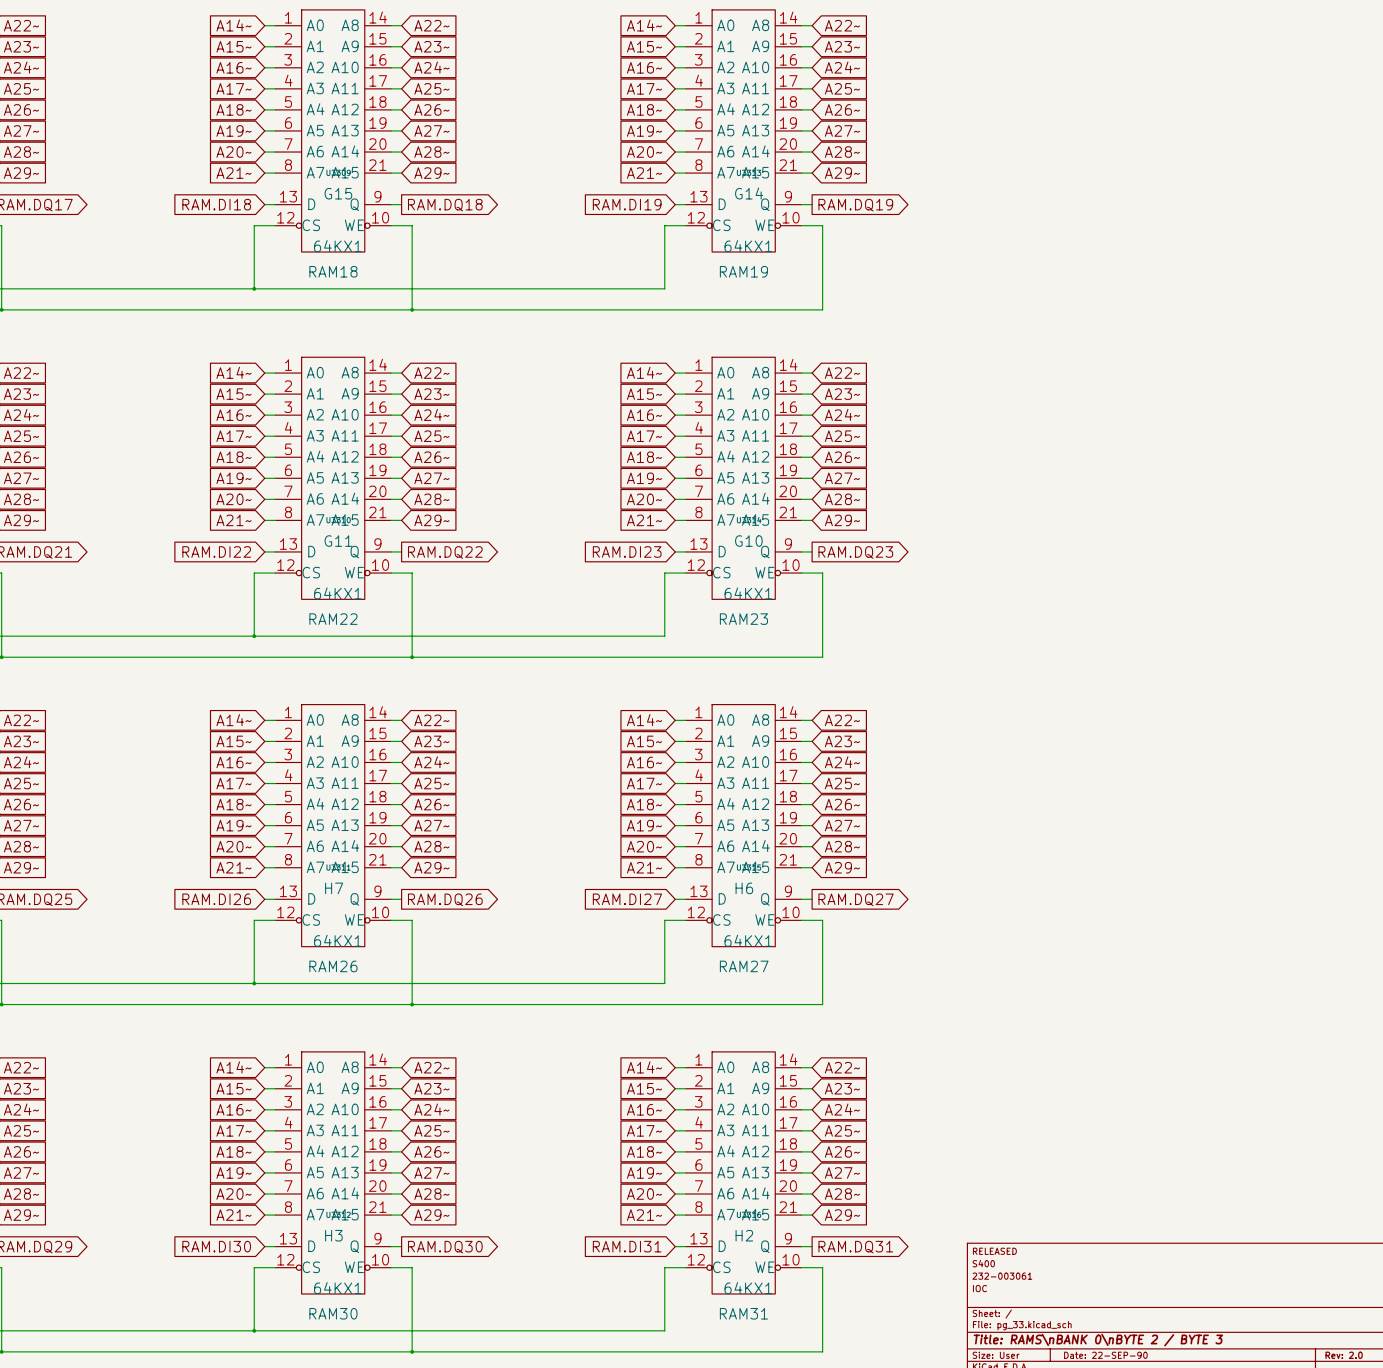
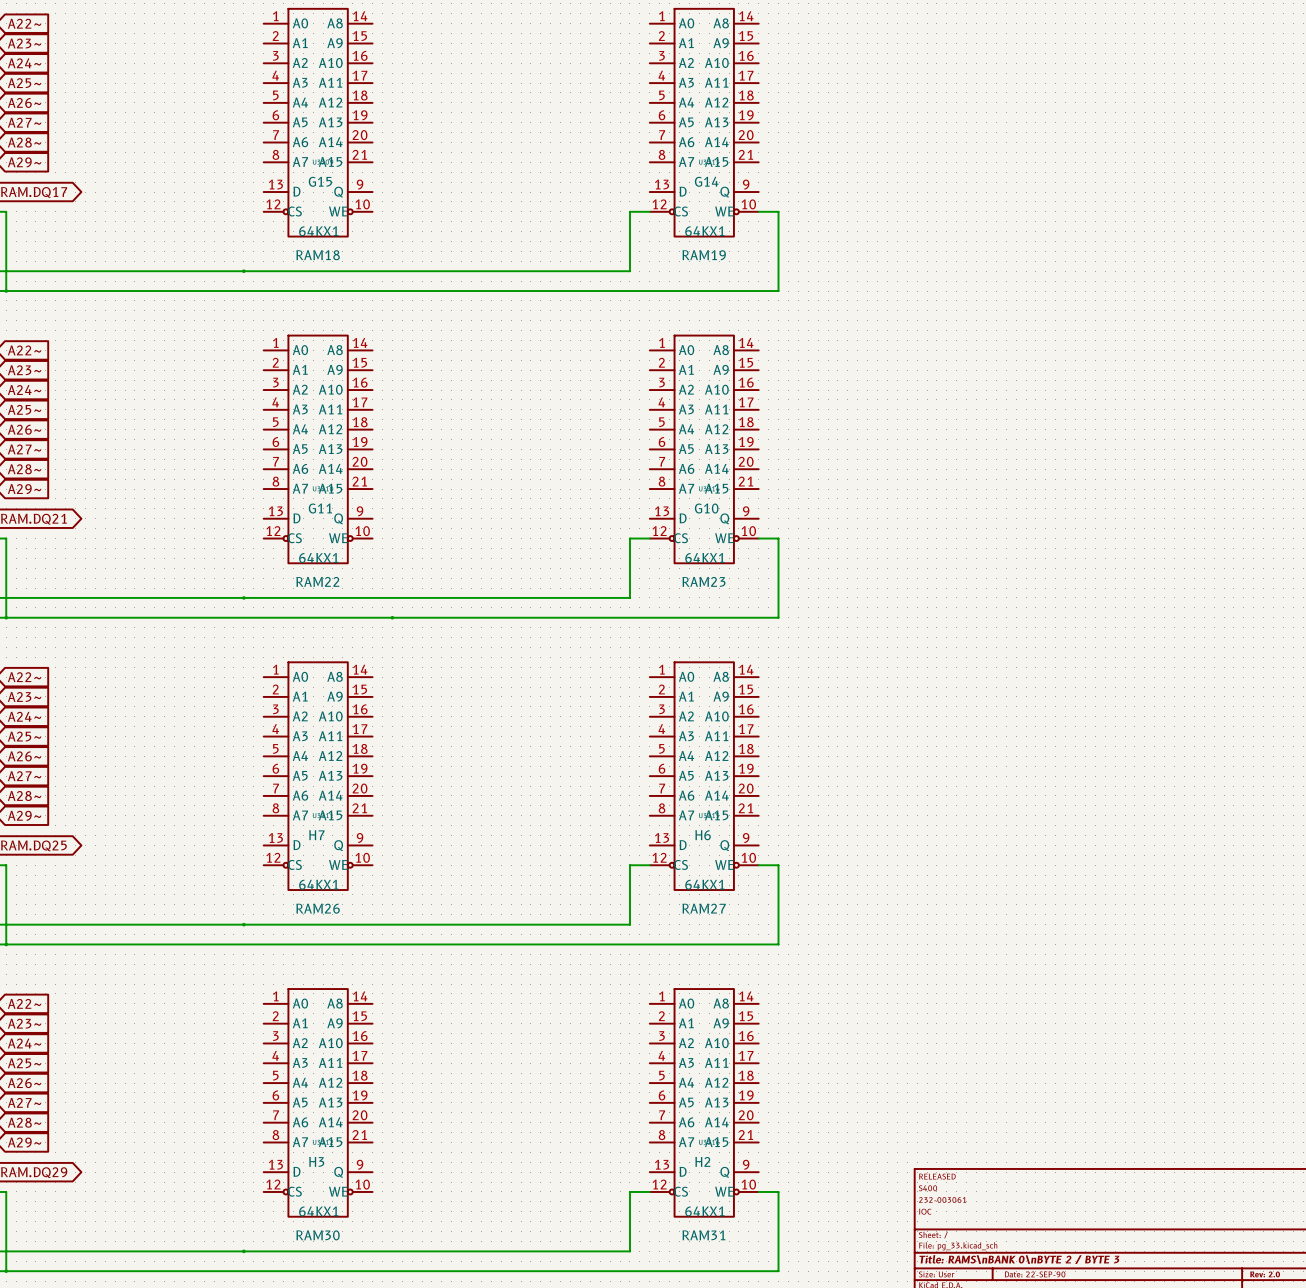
global label: A14~ (233, 25) -> none
wire: (264, 25) (275, 25) -> none
wire: (391, 25) (401, 25) -> none
global label: A22~ (431, 25) -> none
global label: A14~ (644, 25) -> none
wire: (675, 25) (685, 25) -> none
wire: (801, 25) (812, 25) -> none
global label: A22~ (842, 25) -> none
global label: A15~ (233, 46) -> none
wire: (264, 46) (275, 46) -> none
wire: (391, 46) (401, 46) -> none
global label: A23~ (431, 46) -> none
global label: A15~ (644, 46) -> none
wire: (675, 46) (685, 46) -> none
wire: (801, 46) (812, 46) -> none
global label: A23~ (842, 46) -> none
global label: A16~ (233, 67) -> none
wire: (264, 67) (275, 67) -> none
wire: (391, 67) (401, 67) -> none
global label: A24~ (431, 67) -> none
global label: A16~ (644, 67) -> none
wire: (675, 67) (685, 67) -> none
wire: (801, 67) (812, 67) -> none
global label: A24~ (842, 67) -> none
global label: A17~ (233, 88) -> none
wire: (264, 88) (275, 88) -> none
wire: (391, 88) (401, 88) -> none
global label: A25~ (431, 88) -> none
global label: A17~ (644, 88) -> none
wire: (675, 88) (685, 88) -> none
wire: (801, 88) (812, 88) -> none
global label: A25~ (842, 88) -> none
global label: A18~ (233, 109) -> none
wire: (264, 109) (275, 109) -> none
wire: (391, 109) (401, 109) -> none
global label: A26~ (431, 109) -> none
global label: A18~ (644, 109) -> none
wire: (675, 109) (685, 109) -> none
wire: (801, 109) (812, 109) -> none
global label: A26~ (842, 109) -> none
global label: A19~ (233, 130) -> none
wire: (264, 130) (275, 130) -> none
wire: (391, 130) (401, 130) -> none
global label: A27~ (431, 130) -> none
global label: A19~ (644, 130) -> none
wire: (675, 130) (685, 130) -> none
wire: (801, 130) (812, 130) -> none
global label: A27~ (842, 130) -> none
global label: A20~ (233, 152) -> none
wire: (264, 152) (275, 152) -> none
wire: (391, 152) (401, 152) -> none
global label: A28~ (431, 152) -> none
global label: A20~ (644, 152) -> none
wire: (675, 152) (685, 152) -> none
wire: (801, 152) (812, 152) -> none
global label: A28~ (842, 152) -> none
global label: A21~ (233, 173) -> none
wire: (264, 173) (275, 173) -> none
wire: (391, 173) (401, 173) -> none
global label: A29~ (431, 173) -> none
global label: A21~ (644, 173) -> none
wire: (675, 173) (685, 173) -> none
wire: (801, 173) (812, 173) -> none
global label: A29~ (842, 173) -> none
global label: RAM.DI18 (216, 204) -> none
wire: (264, 204) (275, 204) -> none
wire: (391, 204) (401, 204) -> none
global label: RAM.DI19 (627, 204) -> none
wire: (675, 204) (685, 204) -> none
wire: (801, 204) (812, 204) -> none
global label: RAM.DQ18 (445, 205) -> none
global label: RAM.DQ19 (855, 205) -> none
wire: (275, 225) (254, 225) (254, 288) -> none
wire: (391, 225) (412, 225) (412, 309) -> none
junction: (412, 309) -> none
global label: A14~ (233, 372) -> none
global label: A14~ (644, 372) -> none
wire: (264, 373) (275, 373) -> none
wire: (391, 373) (401, 373) -> none
global label: A22~ (431, 373) -> none
wire: (675, 373) (685, 373) -> none
wire: (801, 373) (812, 373) -> none
global label: A22~ (842, 373) -> none
global label: A15~ (233, 394) -> none
wire: (264, 394) (275, 394) -> none
wire: (391, 394) (401, 394) -> none
global label: A23~ (431, 394) -> none
global label: A15~ (644, 394) -> none
wire: (675, 394) (685, 394) -> none
wire: (801, 394) (812, 394) -> none
global label: A23~ (842, 394) -> none
global label: A24~ (431, 414) -> none
global label: A24~ (842, 414) -> none
global label: A16~ (233, 415) -> none
wire: (264, 415) (275, 415) -> none
wire: (391, 415) (401, 415) -> none
global label: A16~ (644, 415) -> none
wire: (675, 415) (685, 415) -> none
wire: (801, 415) (812, 415) -> none
global label: A17~ (233, 436) -> none
wire: (264, 436) (275, 436) -> none
wire: (391, 436) (401, 436) -> none
global label: A25~ (431, 436) -> none
global label: A17~ (644, 436) -> none
wire: (675, 436) (685, 436) -> none
wire: (801, 436) (812, 436) -> none
global label: A25~ (842, 436) -> none
global label: A18~ (233, 457) -> none
wire: (264, 457) (275, 457) -> none
wire: (391, 457) (401, 457) -> none
global label: A26~ (431, 457) -> none
global label: A18~ (644, 457) -> none
wire: (675, 457) (685, 457) -> none
wire: (801, 457) (812, 457) -> none
global label: A26~ (842, 457) -> none
global label: A19~ (233, 478) -> none
wire: (264, 478) (275, 478) -> none
wire: (391, 478) (401, 478) -> none
global label: A27~ (431, 478) -> none
global label: A19~ (644, 478) -> none
wire: (675, 478) (685, 478) -> none
wire: (801, 478) (812, 478) -> none
global label: A27~ (842, 478) -> none
global label: A20~ (233, 499) -> none
wire: (264, 499) (275, 499) -> none
wire: (391, 499) (401, 499) -> none
global label: A28~ (431, 499) -> none
global label: A20~ (644, 499) -> none
wire: (675, 499) (685, 499) -> none
wire: (801, 499) (812, 499) -> none
global label: A28~ (842, 499) -> none
global label: A21~ (233, 520) -> none
wire: (264, 520) (275, 520) -> none
wire: (391, 520) (401, 520) -> none
global label: A29~ (431, 520) -> none
global label: A21~ (644, 520) -> none
wire: (675, 520) (685, 520) -> none
wire: (801, 520) (812, 520) -> none
global label: A29~ (842, 520) -> none
global label: RAM.DI22 (216, 551) -> none
wire: (264, 551) (275, 551) -> none
wire: (391, 551) (401, 551) -> none
global label: RAM.DI23 (627, 551) -> none
wire: (675, 551) (685, 551) -> none
wire: (801, 551) (812, 551) -> none
global label: RAM.DQ22 (445, 552) -> none
global label: RAM.DQ23 (855, 552) -> none
wire: (275, 573) (254, 573) (254, 636) -> none
wire: (391, 573) (412, 573) (412, 657) -> none
global label: A14~ (233, 720) -> none
wire: (264, 720) (275, 720) -> none
wire: (391, 720) (401, 720) -> none
global label: A22~ (431, 720) -> none
global label: A14~ (644, 720) -> none
wire: (675, 720) (685, 720) -> none
wire: (801, 720) (812, 720) -> none
global label: A22~ (842, 720) -> none
global label: A15~ (233, 741) -> none
wire: (264, 741) (275, 741) -> none
wire: (391, 741) (401, 741) -> none
global label: A23~ (431, 741) -> none
global label: A15~ (644, 741) -> none
wire: (675, 741) (685, 741) -> none
wire: (801, 741) (812, 741) -> none
global label: A23~ (842, 741) -> none
global label: A16~ (233, 762) -> none
wire: (264, 762) (275, 762) -> none
wire: (391, 762) (401, 762) -> none
global label: A24~ (431, 762) -> none
global label: A16~ (644, 762) -> none
wire: (675, 762) (685, 762) -> none
wire: (801, 762) (812, 762) -> none
global label: A24~ (842, 762) -> none
global label: A17~ (233, 783) -> none
wire: (264, 783) (275, 783) -> none
wire: (391, 783) (401, 783) -> none
global label: A25~ (431, 783) -> none
global label: A17~ (644, 783) -> none
wire: (675, 783) (685, 783) -> none
wire: (801, 783) (812, 783) -> none
global label: A25~ (842, 783) -> none
global label: A18~ (233, 804) -> none
wire: (264, 804) (275, 804) -> none
wire: (391, 804) (401, 804) -> none
global label: A26~ (431, 804) -> none
global label: A18~ (644, 804) -> none
wire: (675, 804) (685, 804) -> none
wire: (801, 804) (812, 804) -> none
global label: A26~ (842, 804) -> none
global label: A19~ (233, 825) -> none
wire: (264, 825) (275, 825) -> none
wire: (391, 825) (401, 825) -> none
global label: A27~ (431, 825) -> none
global label: A19~ (644, 825) -> none
wire: (675, 825) (685, 825) -> none
wire: (801, 825) (812, 825) -> none
global label: A27~ (842, 825) -> none
global label: A20~ (233, 846) -> none
wire: (264, 846) (275, 846) -> none
wire: (391, 846) (401, 846) -> none
global label: A28~ (431, 846) -> none
global label: A20~ (644, 846) -> none
wire: (675, 846) (685, 846) -> none
wire: (801, 846) (812, 846) -> none
global label: A28~ (842, 846) -> none
global label: A21~ (233, 867) -> none
wire: (264, 867) (275, 867) -> none
wire: (391, 867) (401, 867) -> none
global label: A29~ (431, 867) -> none
global label: A21~ (644, 867) -> none
wire: (675, 867) (685, 867) -> none
wire: (801, 867) (812, 867) -> none
global label: A29~ (842, 867) -> none
global label: RAM.DI26 (216, 899) -> none
wire: (264, 899) (275, 899) -> none
wire: (391, 899) (401, 899) -> none
global label: RAM.DQ26 (445, 899) -> none
global label: RAM.DI27 (627, 899) -> none
wire: (675, 899) (685, 899) -> none
wire: (801, 899) (812, 899) -> none
global label: RAM.DQ27 (856, 899) -> none
wire: (275, 920) (254, 920) (254, 983) -> none
wire: (391, 920) (412, 920) (412, 1004) -> none
junction: (412, 1004) -> none
global label: A14~ (233, 1067) -> none
wire: (264, 1067) (275, 1067) -> none
wire: (391, 1067) (401, 1067) -> none
global label: A22~ (431, 1067) -> none
global label: A14~ (644, 1067) -> none
wire: (675, 1067) (685, 1067) -> none
wire: (801, 1067) (812, 1067) -> none
global label: A22~ (842, 1067) -> none
global label: A15~ (233, 1088) -> none
wire: (264, 1088) (275, 1088) -> none
wire: (391, 1088) (401, 1088) -> none
global label: A23~ (431, 1088) -> none
global label: A15~ (644, 1088) -> none
wire: (675, 1088) (685, 1088) -> none
wire: (801, 1088) (812, 1088) -> none
global label: A23~ (842, 1088) -> none
global label: A16~ (233, 1109) -> none
wire: (264, 1109) (275, 1109) -> none
wire: (391, 1109) (401, 1109) -> none
global label: A24~ (431, 1109) -> none
global label: A16~ (644, 1109) -> none
wire: (675, 1109) (685, 1109) -> none
wire: (801, 1109) (812, 1109) -> none
global label: A24~ (842, 1109) -> none
global label: A17~ (233, 1130) -> none
wire: (264, 1130) (275, 1130) -> none
wire: (391, 1130) (401, 1130) -> none
global label: A25~ (431, 1130) -> none
global label: A17~ (644, 1130) -> none
wire: (675, 1130) (685, 1130) -> none
wire: (801, 1130) (812, 1130) -> none
global label: A25~ (842, 1130) -> none
global label: A18~ (233, 1151) -> none
wire: (264, 1151) (275, 1151) -> none
wire: (391, 1151) (401, 1151) -> none
global label: A26~ (431, 1151) -> none
global label: A18~ (644, 1151) -> none
wire: (675, 1151) (685, 1151) -> none
wire: (801, 1151) (812, 1151) -> none
global label: A26~ (842, 1151) -> none
global label: A19~ (233, 1172) -> none
wire: (264, 1172) (275, 1172) -> none
wire: (391, 1172) (401, 1172) -> none
global label: A27~ (431, 1172) -> none
global label: A19~ (644, 1172) -> none
wire: (675, 1172) (685, 1172) -> none
wire: (801, 1172) (812, 1172) -> none
global label: A27~ (842, 1172) -> none
global label: A20~ (233, 1194) -> none
wire: (264, 1194) (275, 1194) -> none
wire: (391, 1194) (401, 1194) -> none
global label: A28~ (431, 1194) -> none
global label: A20~ (644, 1194) -> none
wire: (675, 1194) (685, 1194) -> none
wire: (801, 1194) (812, 1194) -> none
global label: A28~ (842, 1194) -> none
global label: A21~ (233, 1215) -> none
wire: (264, 1215) (275, 1215) -> none
wire: (391, 1215) (401, 1215) -> none
global label: A29~ (431, 1215) -> none
global label: A21~ (644, 1215) -> none
wire: (675, 1215) (685, 1215) -> none
wire: (801, 1215) (812, 1215) -> none
global label: A29~ (842, 1215) -> none
global label: RAM.DI30 (216, 1246) -> none
wire: (264, 1246) (275, 1246) -> none
wire: (391, 1246) (401, 1246) -> none
global label: RAM.DI31 (627, 1246) -> none
wire: (675, 1246) (685, 1246) -> none
wire: (801, 1246) (812, 1246) -> none
global label: RAM.DQ30 (445, 1247) -> none
global label: RAM.DQ31 (855, 1247) -> none
wire: (275, 1267) (254, 1267) (254, 1330) -> none
wire: (391, 1267) (412, 1267) (412, 1351) -> none
junction: (412, 1351) -> none

